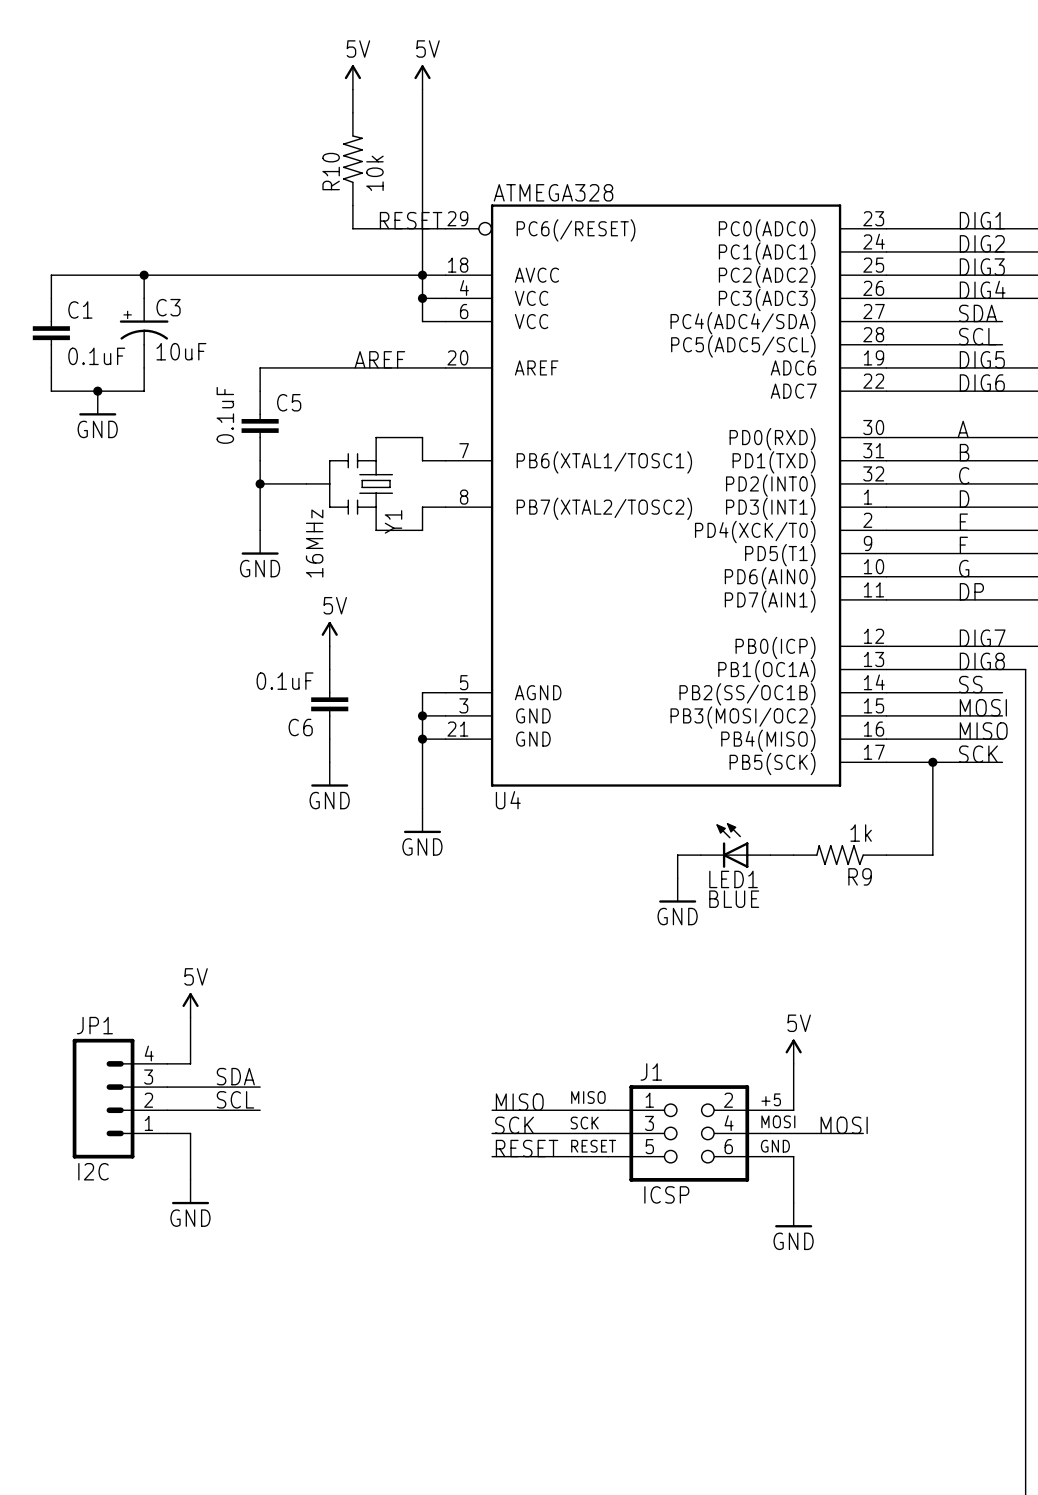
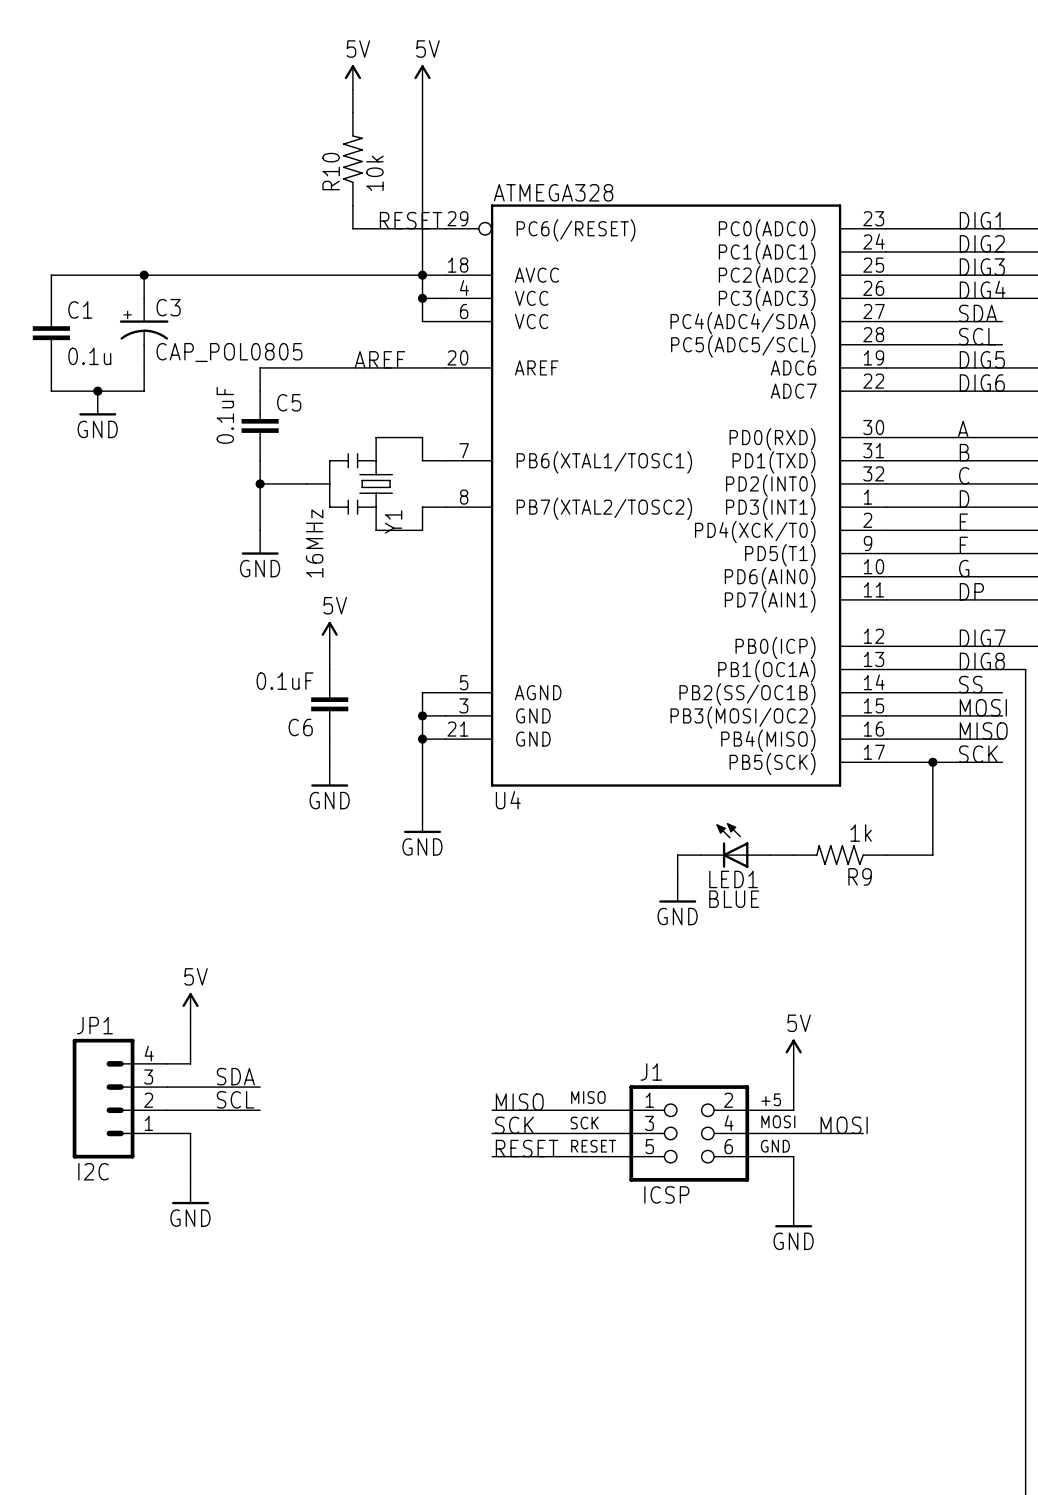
C3 value: 10uF (181, 351) -> CAP_POL0805 (229, 352)
C1 value: 0.1uF (96, 356) -> 0.1u (89, 356)

